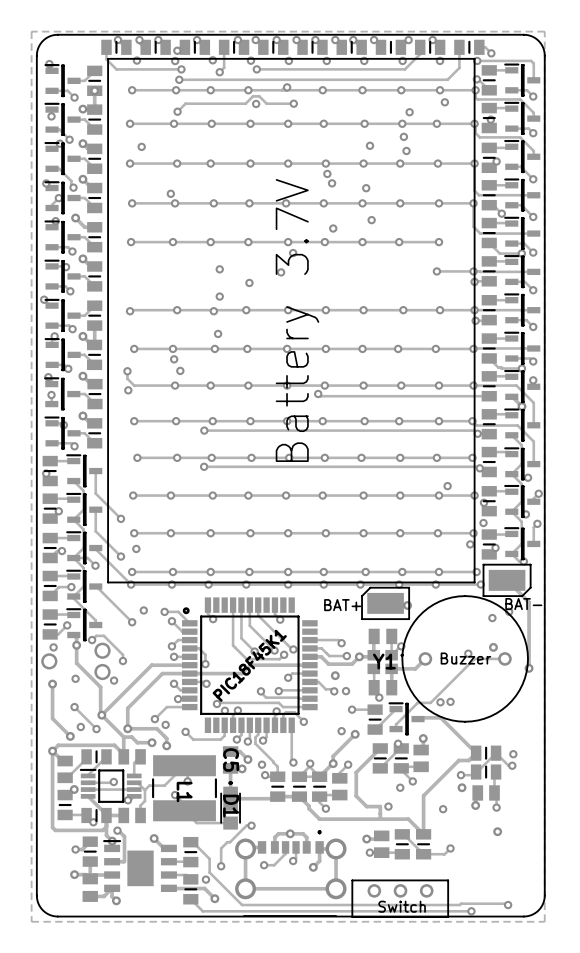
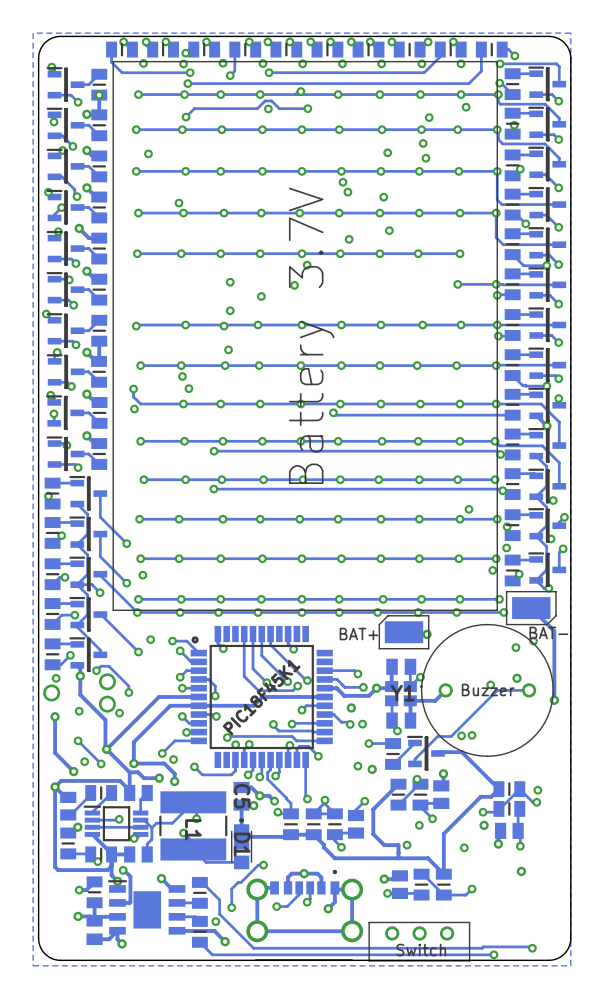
track: (355, 734) (333, 756) (333, 763) (319, 776) -> none
track: none -> (259, 795) (269, 795) (274, 801)
via: (333, 763) -> none

